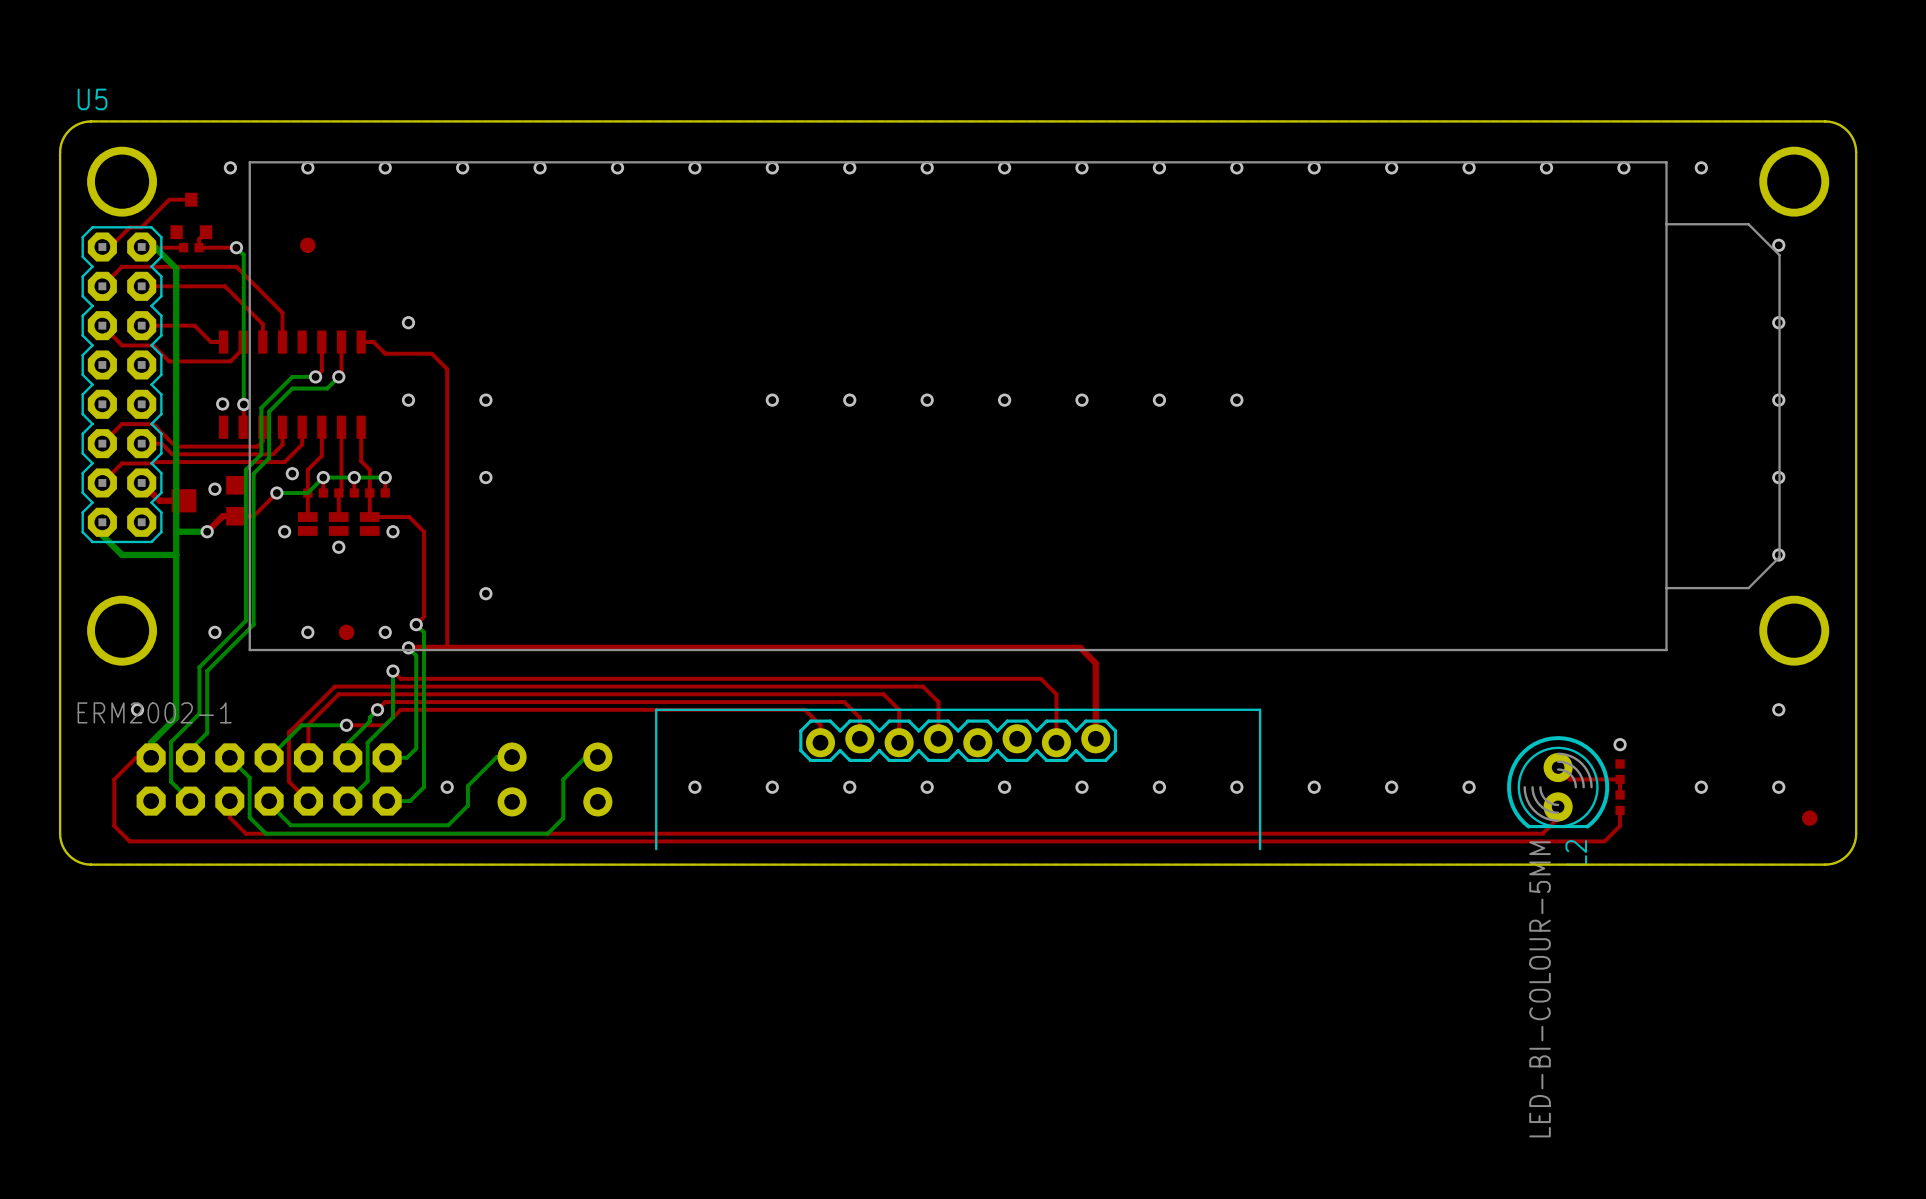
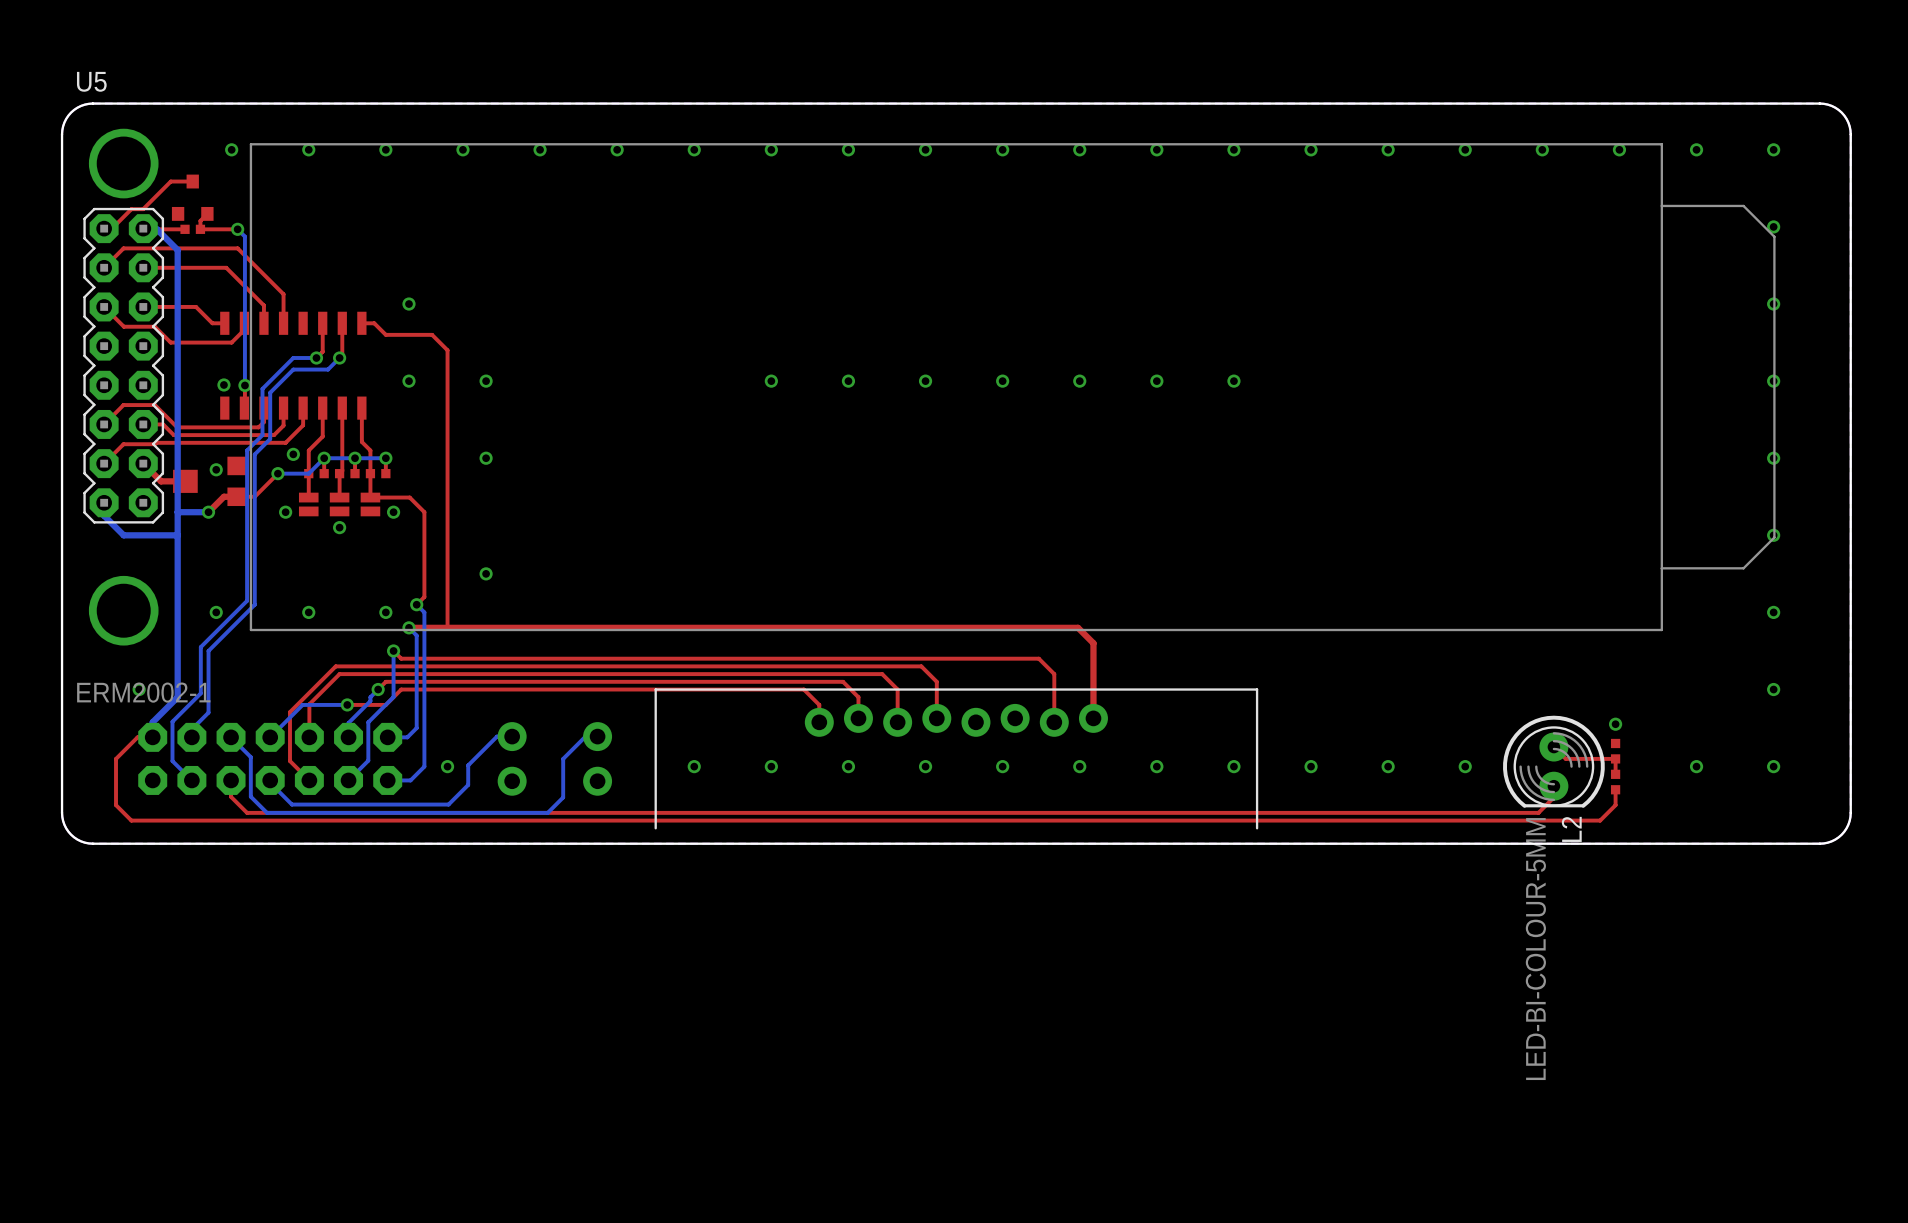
U5 footprint: [81, 146, 1830, 666] -> [83, 128, 1776, 646]
via: none -> (1773, 149)
part: (307, 245) -> none
part: (346, 632) -> none
via: none -> (1773, 612)
part footprint: [655, 708, 1262, 851] -> [654, 688, 1259, 830]
part: (1809, 818) -> none

